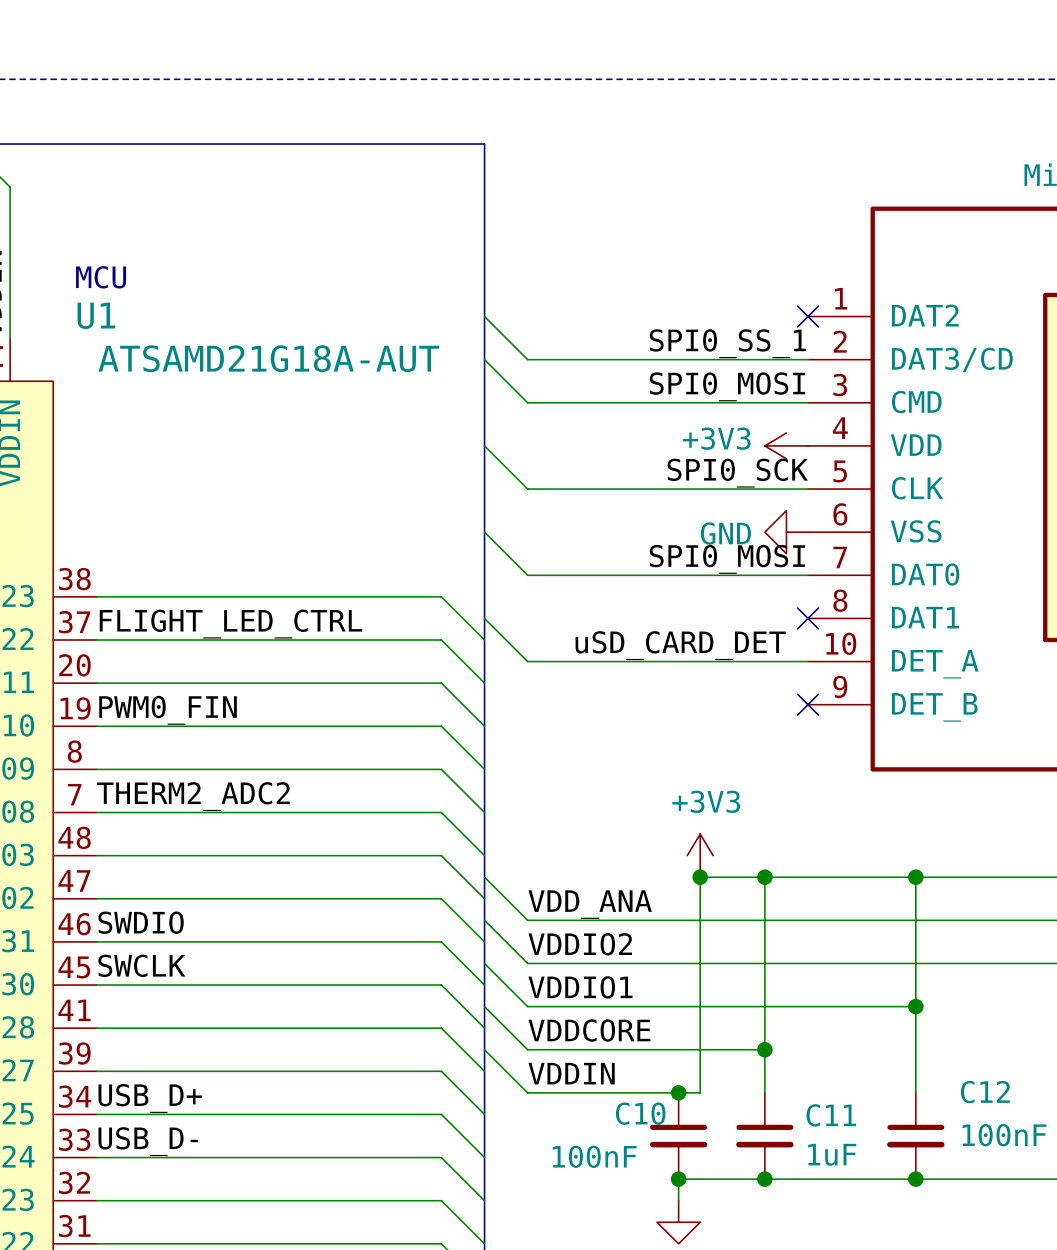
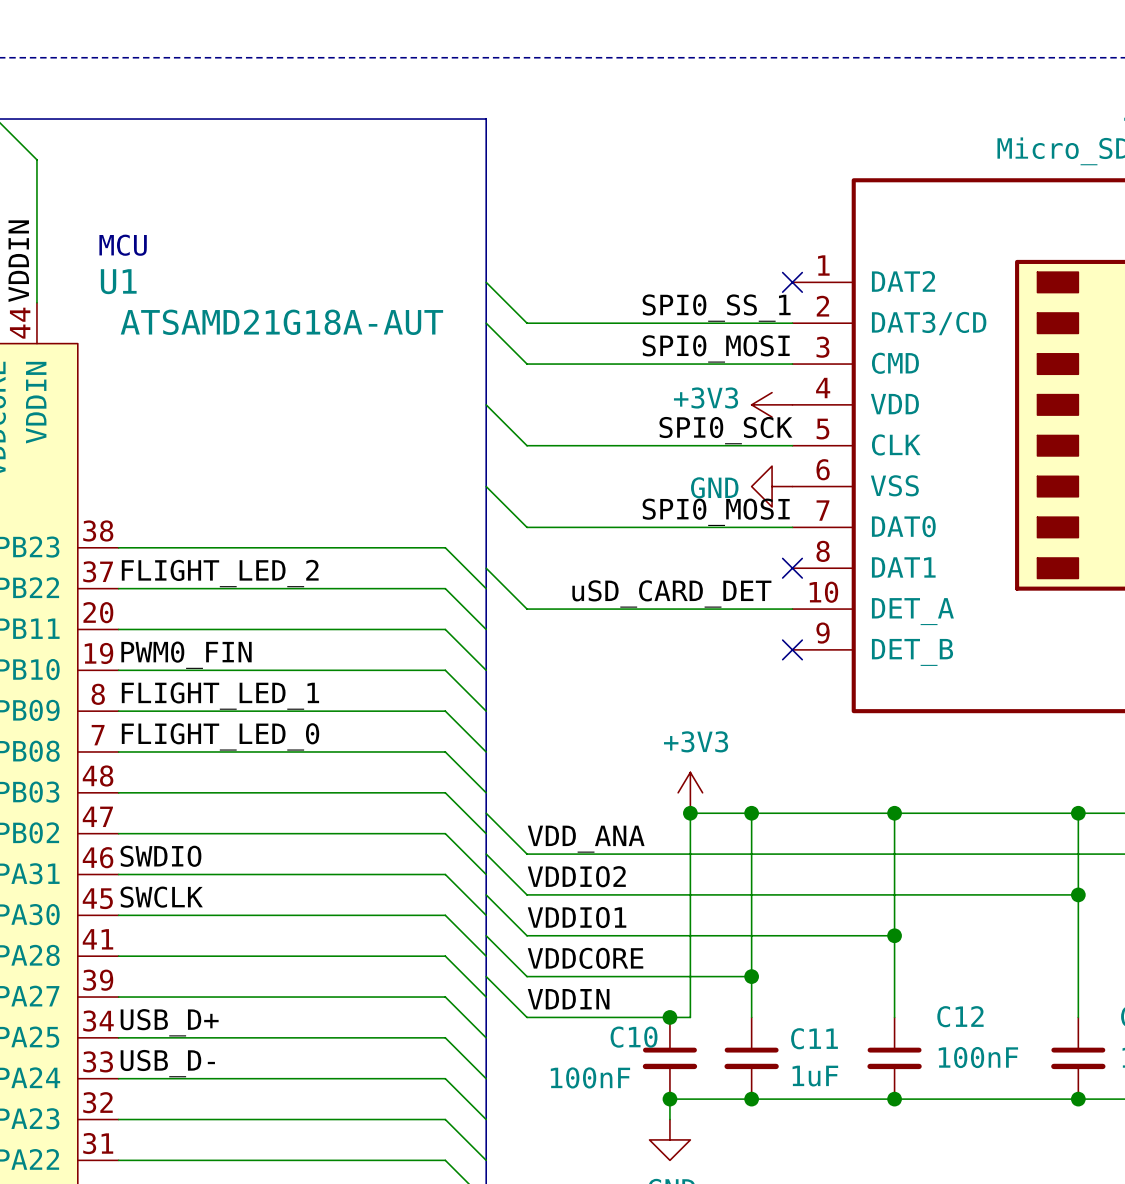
label: FLIGHT_LED_CTRL (230, 624) -> FLIGHT_LED_2 (220, 573)
label: none -> FLIGHT_LED_1 (220, 696)
label: THERM2_ADC2 (193, 796) -> FLIGHT_LED_0 (220, 736)

